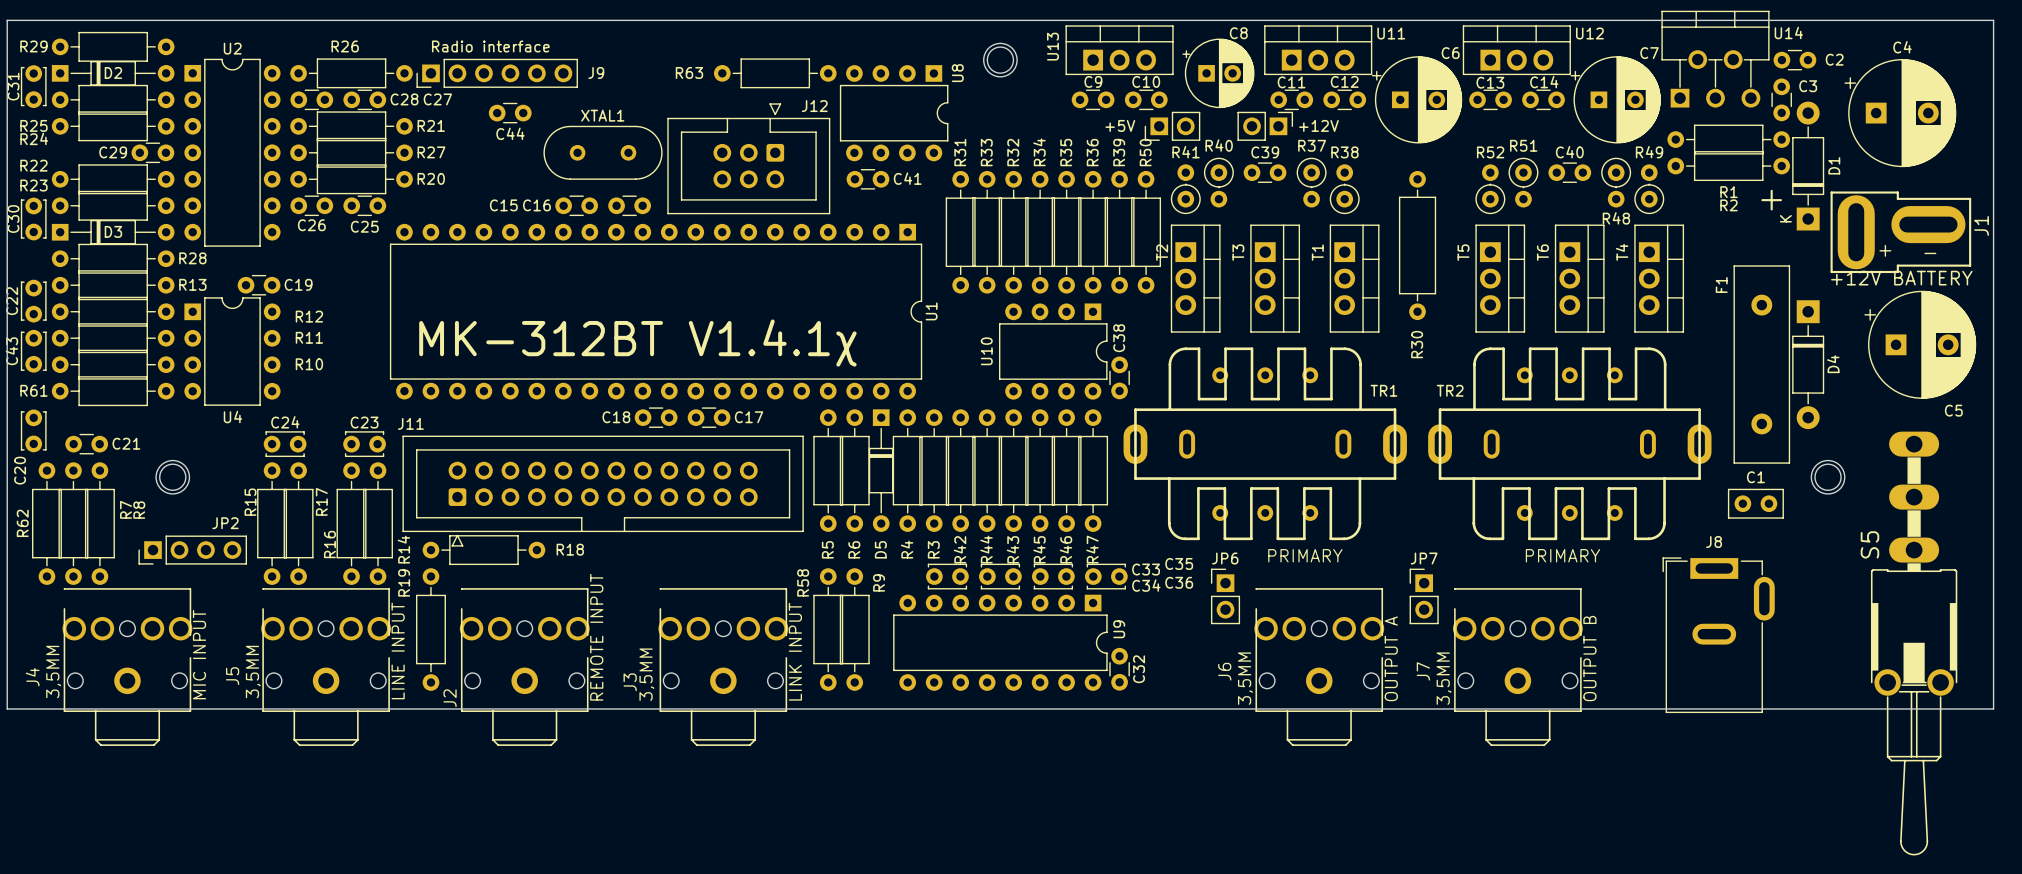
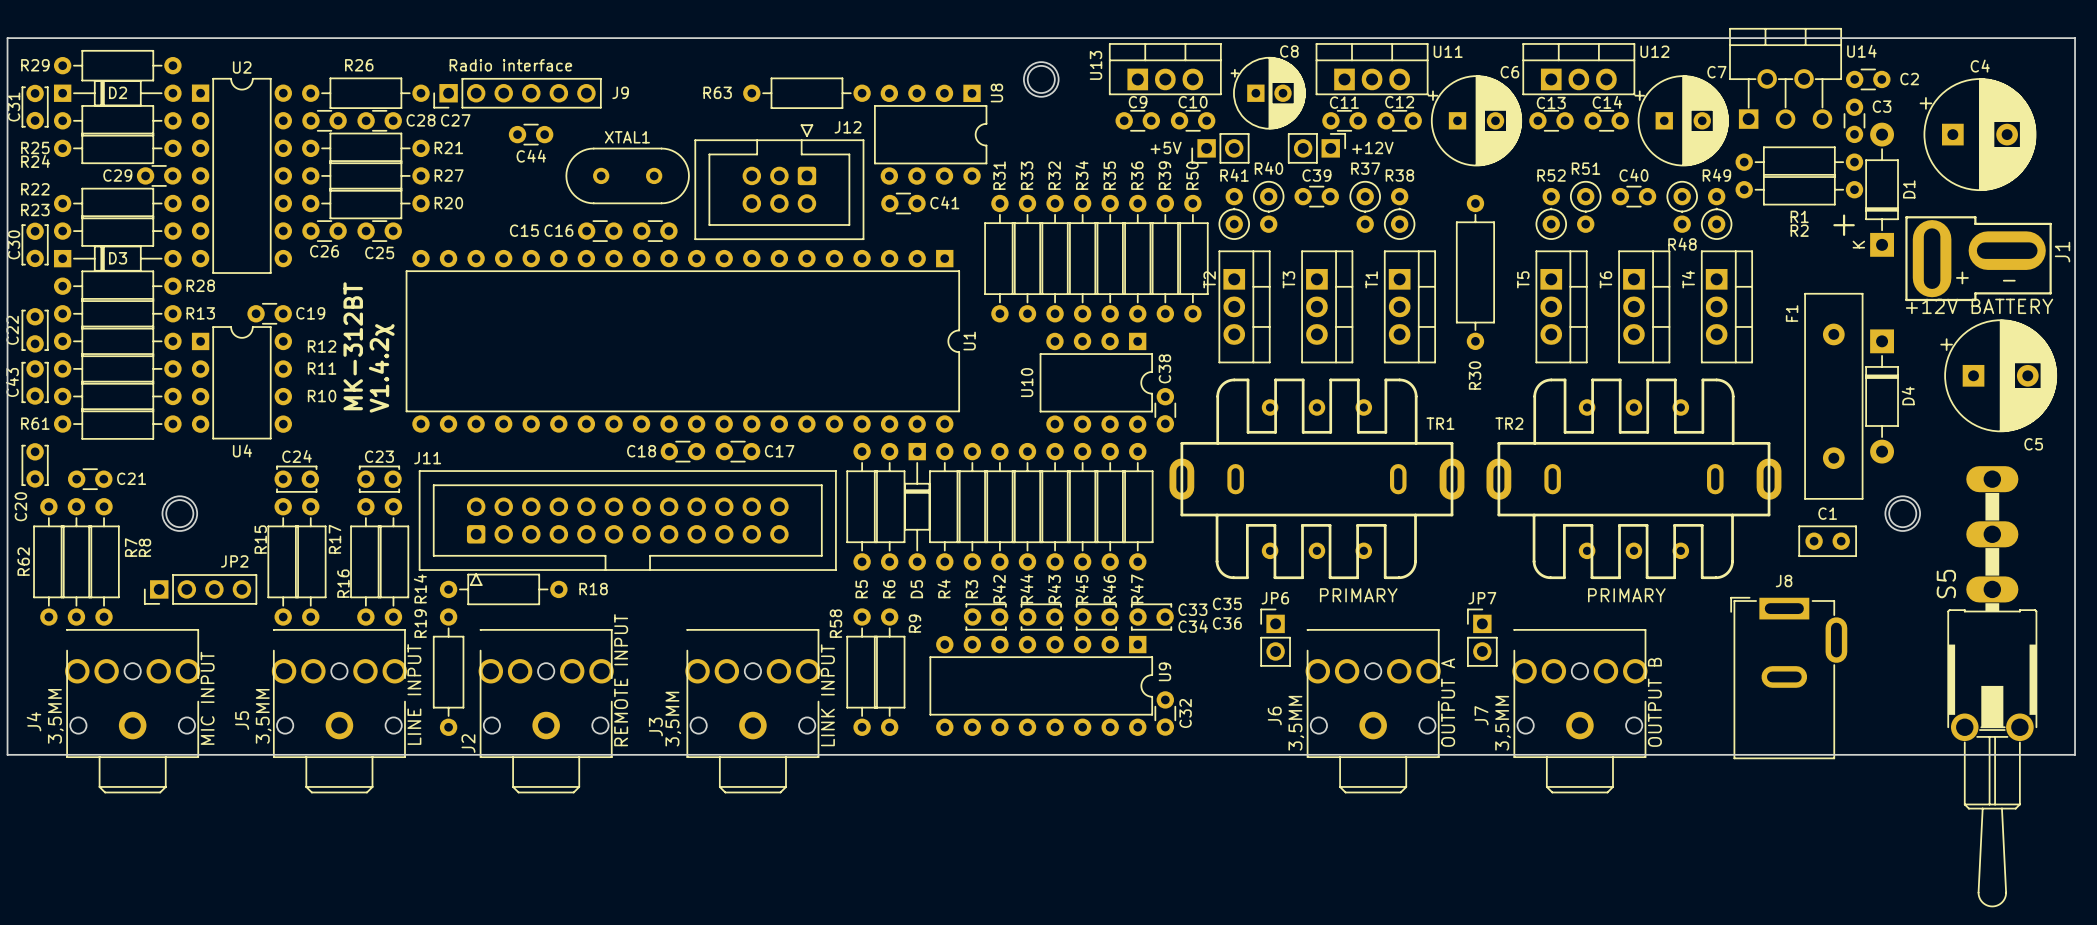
text: none -> MK-312BT (353, 346)
text: none -> V1.4.2χ (381, 368)
text: MK-312BT V1.4.1χ (637, 343) -> none

